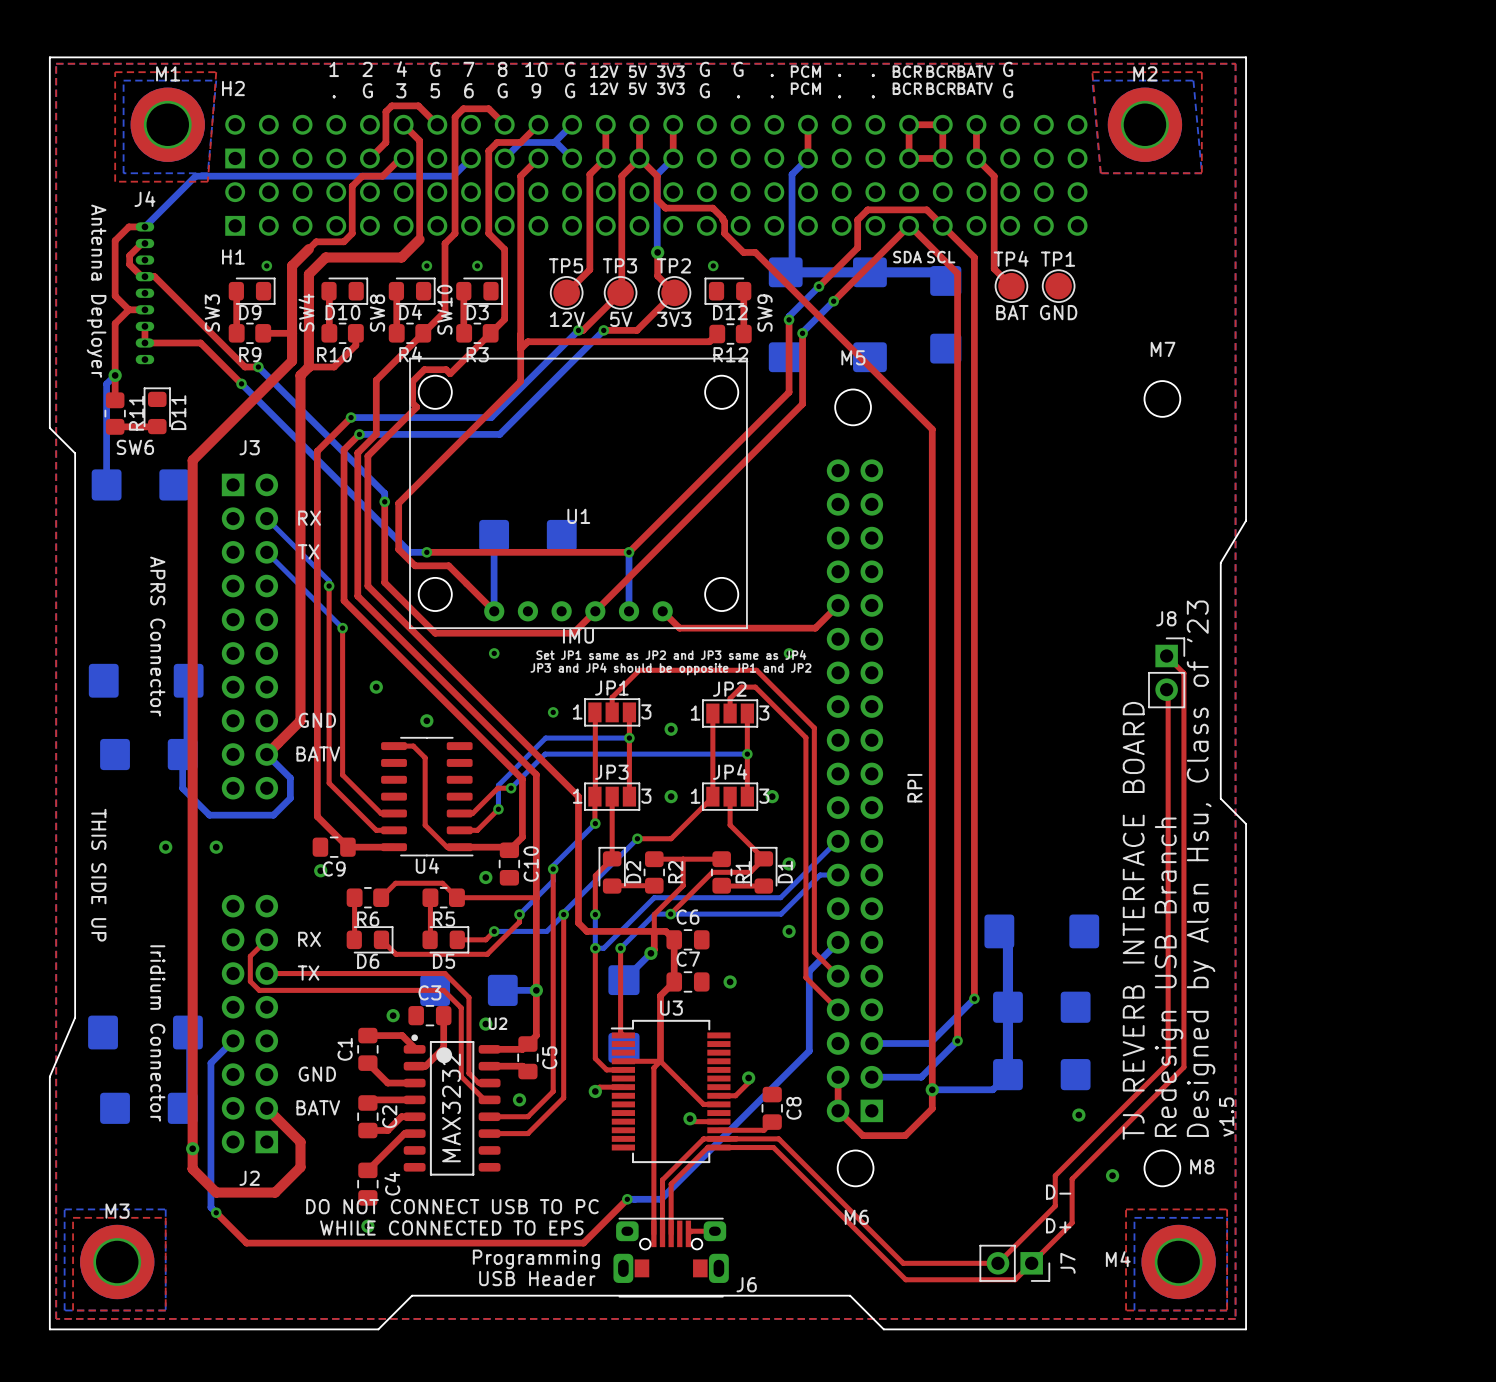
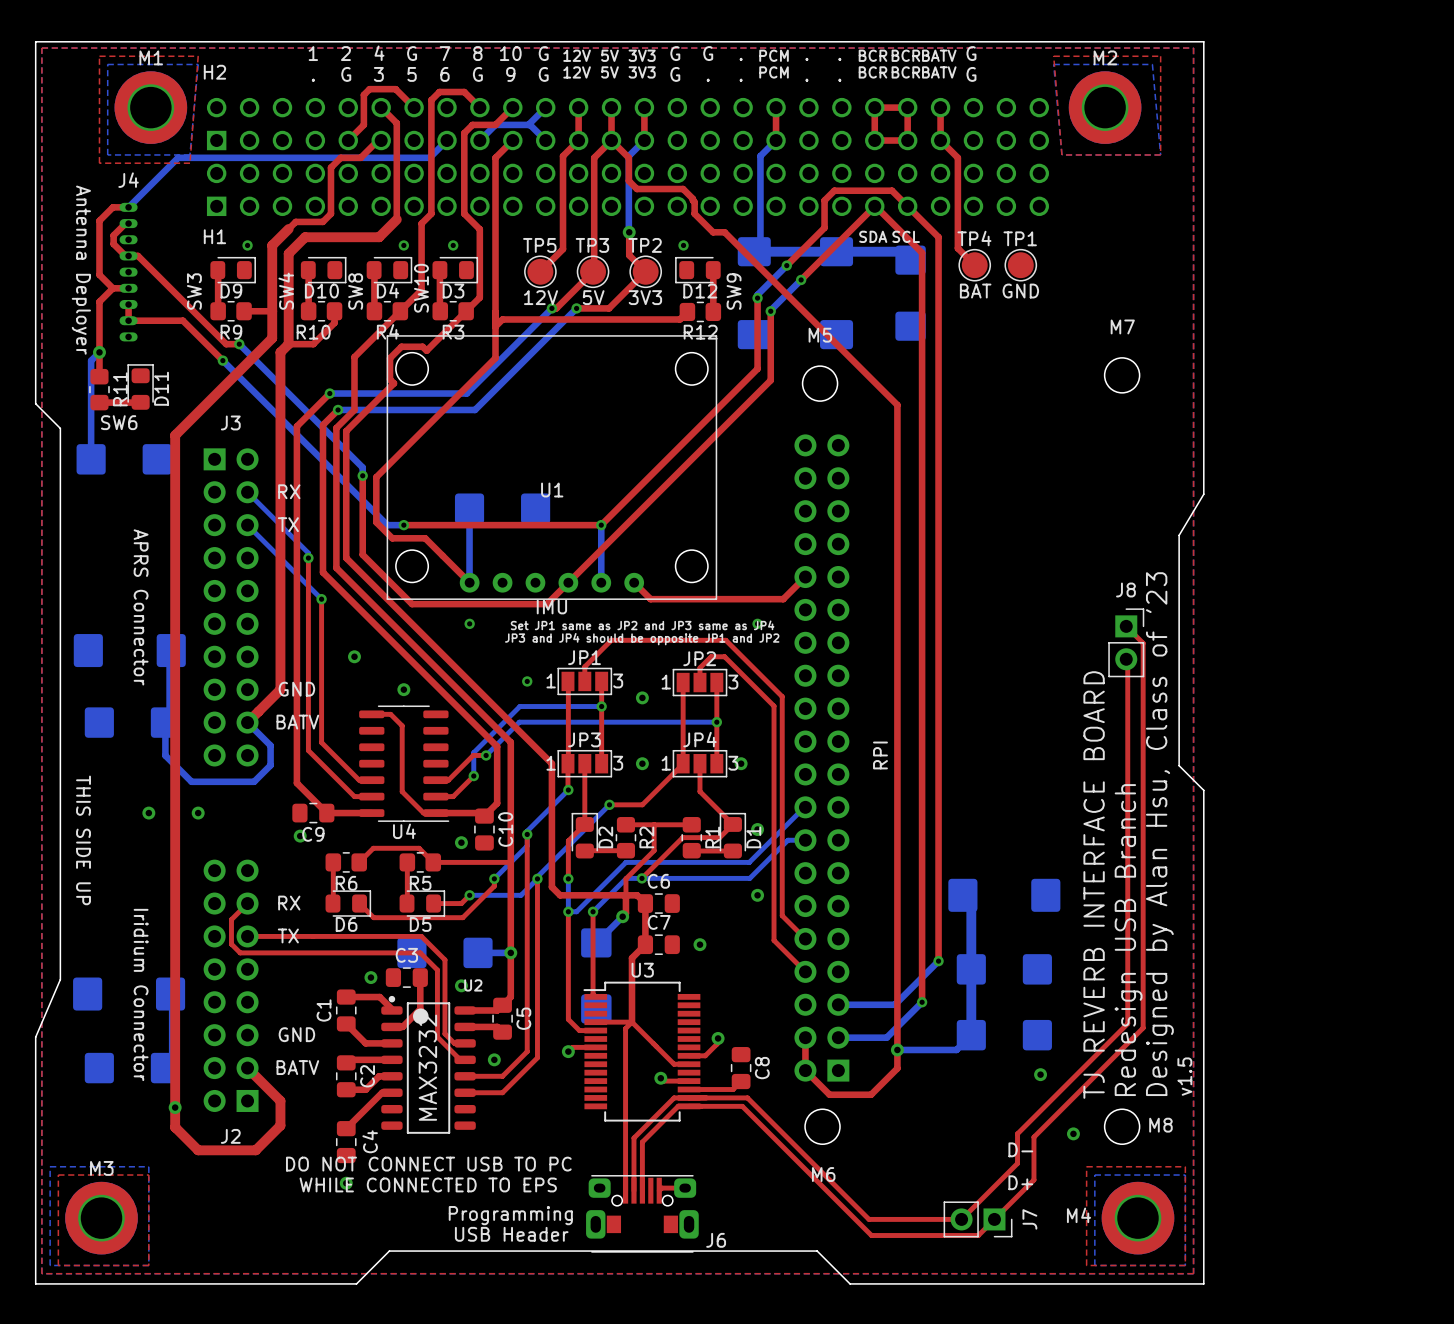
bottom track: (838, 942) (809, 971) (809, 1051) (661, 1199) (627, 1199) -> none
bottom track: (233, 1040) (210, 1063) (210, 1207) (216, 1212) -> none
top track: (627, 1199) (583, 1243) (246, 1243) (216, 1212) -> none
via: (627, 1199) -> none
via: (216, 1212) -> none

